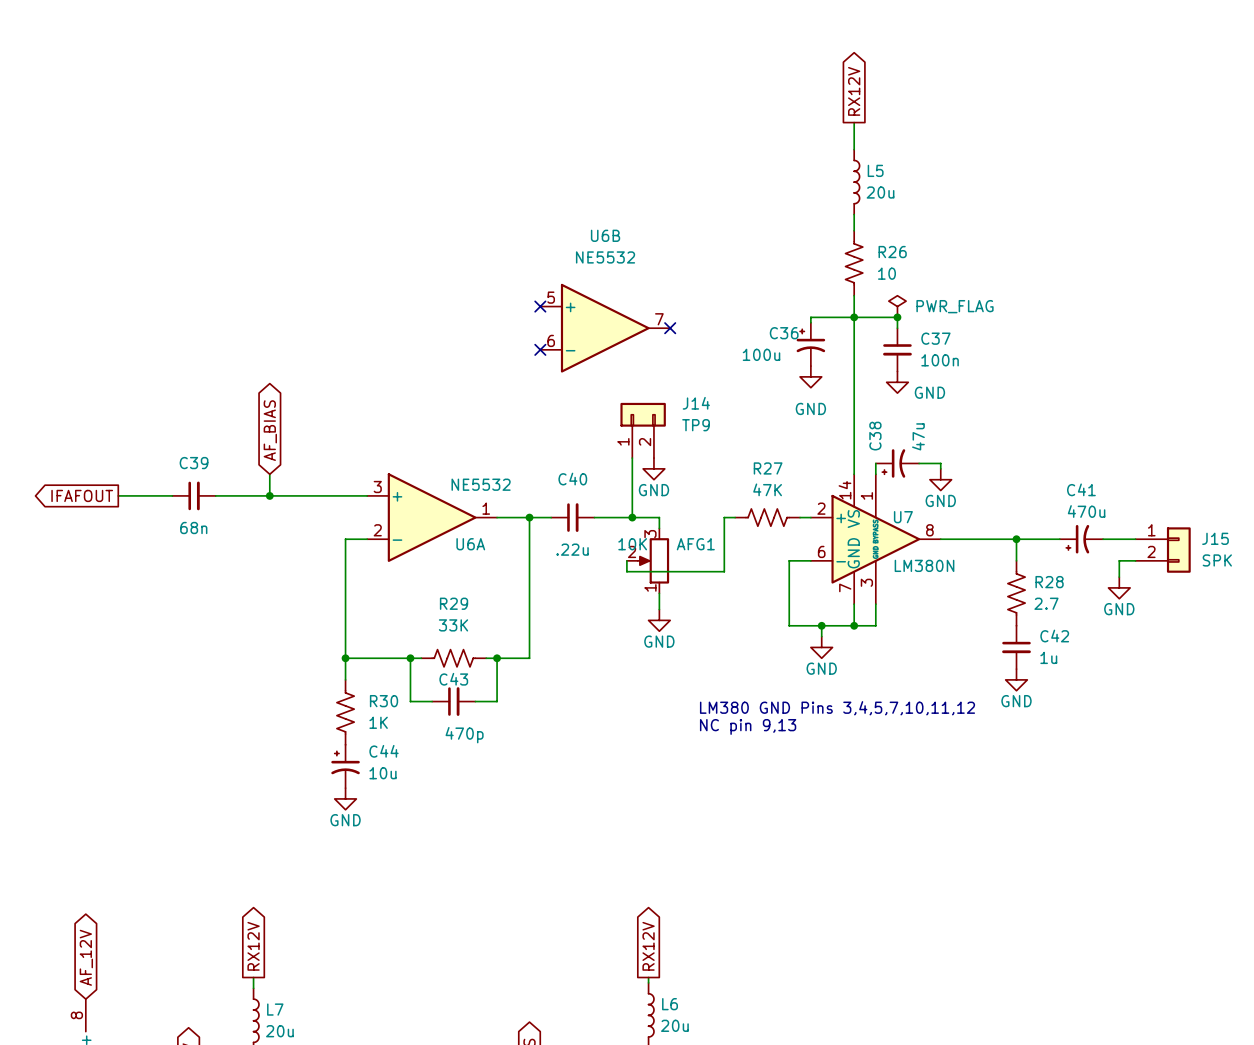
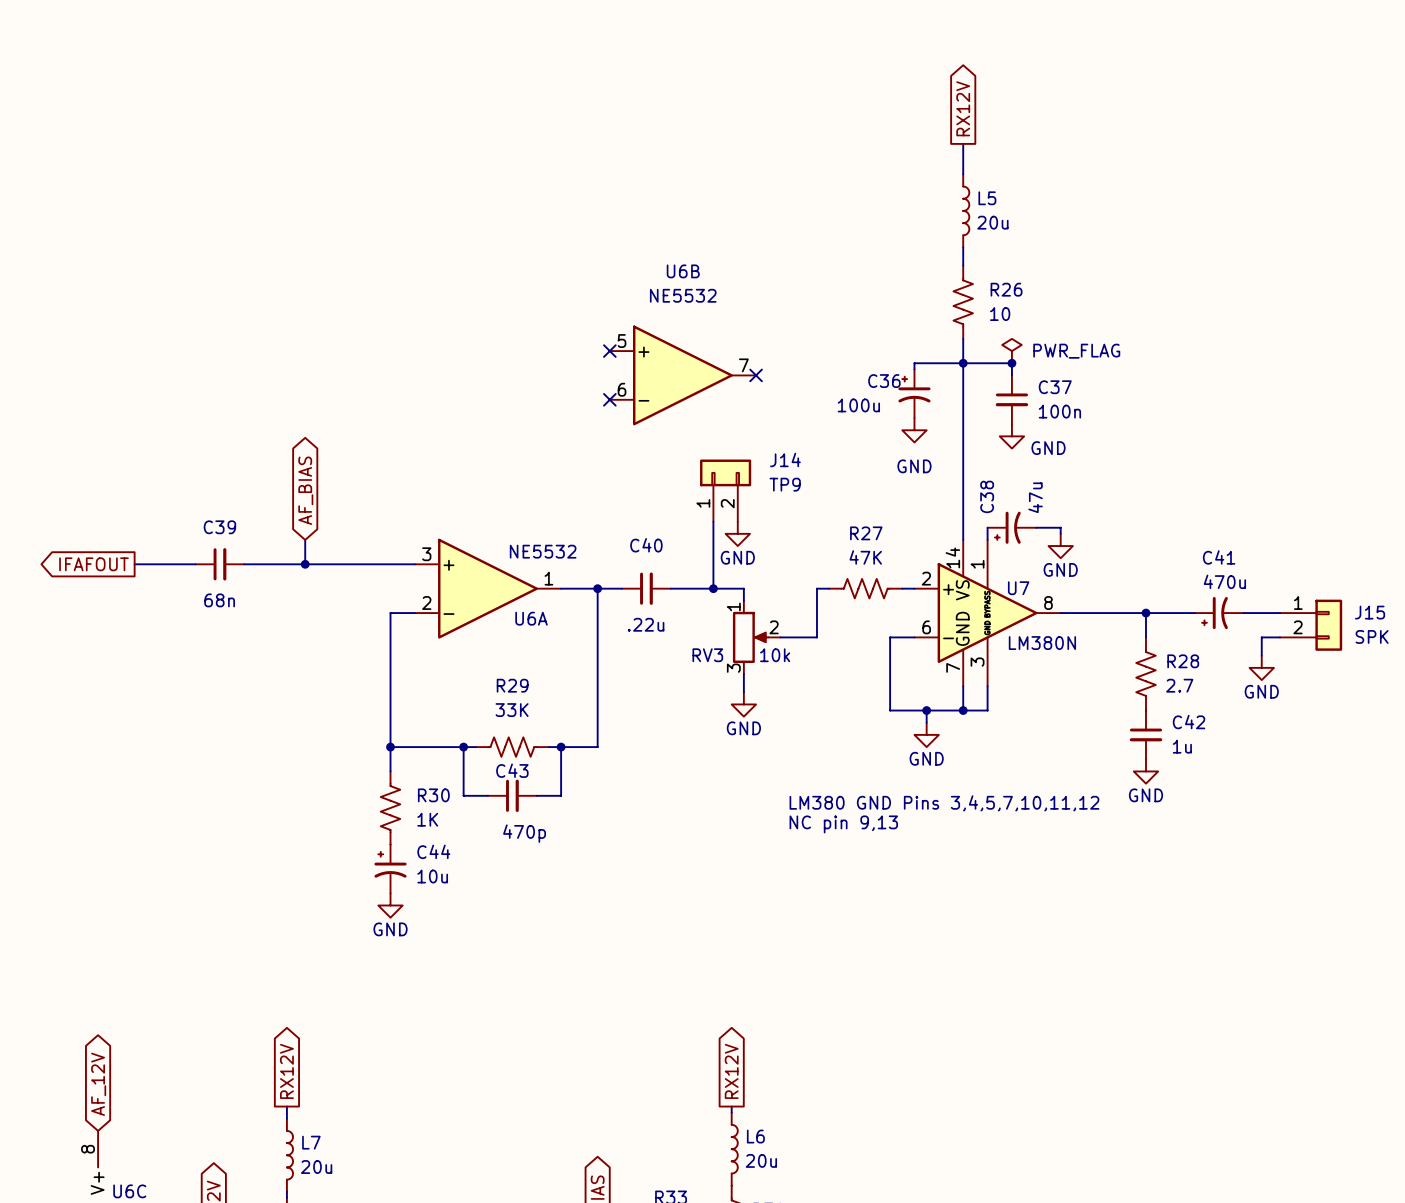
wire: (626, 560) (626, 571) (724, 571) (724, 560) -> (780, 637) (816, 637)
AFG1: 10K (648, 560) -> none
RV3: none -> 10k (756, 637)

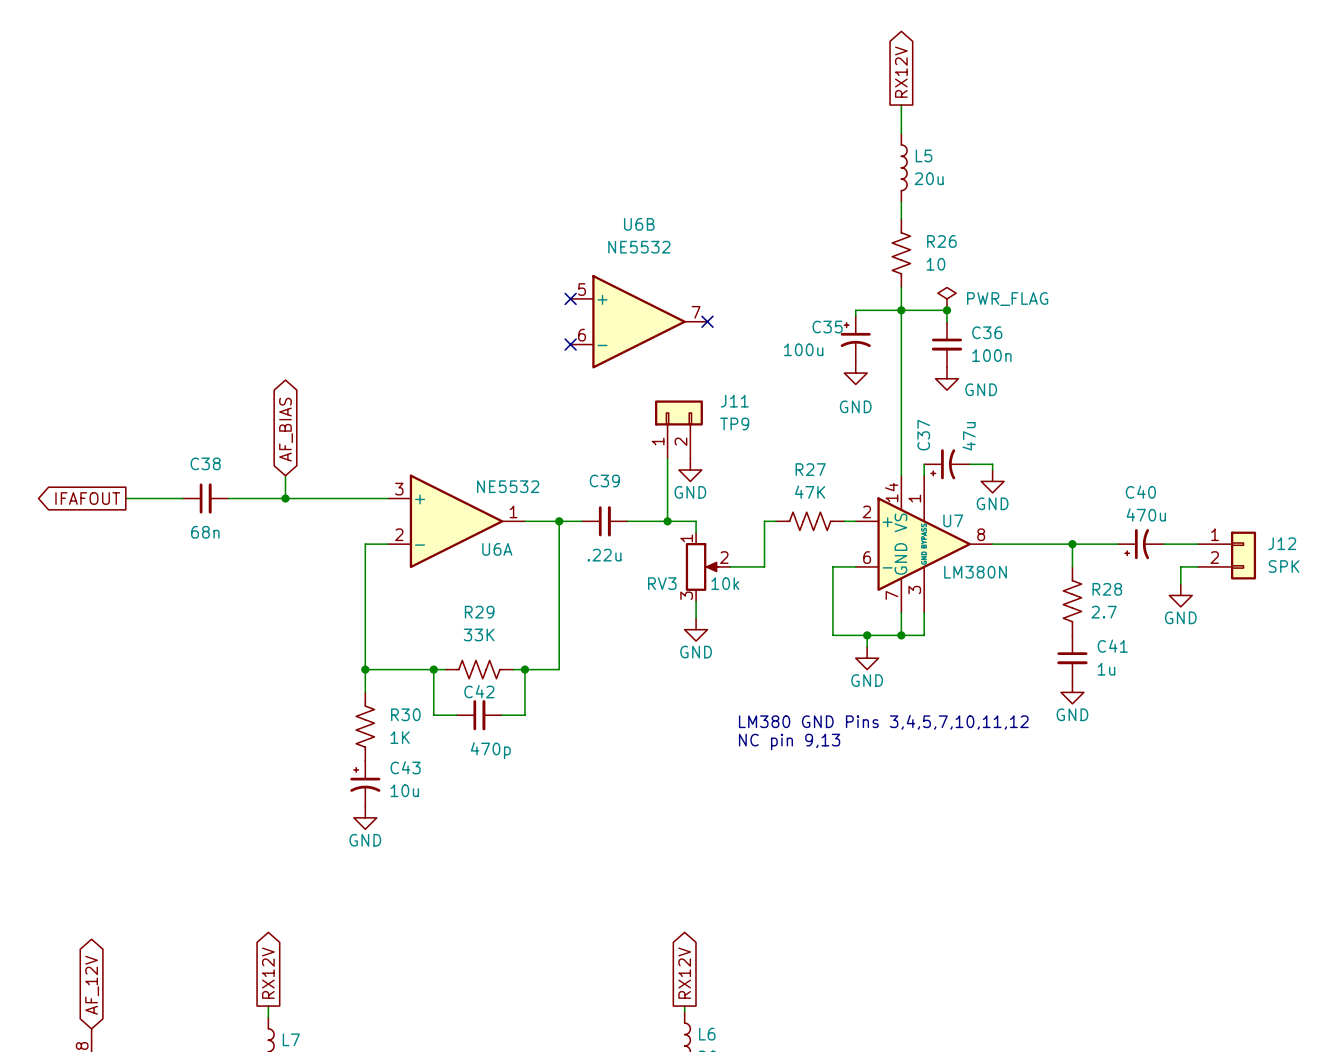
C36 name: C36 (884, 381) -> C35 (827, 327)
C37 name: C37 (1055, 387) -> C36 (987, 332)
J14 name: J14 (785, 459) -> J11 (734, 401)
C38 name: C38 (987, 496) -> C37 (923, 435)
C39 name: C39 (219, 527) -> C38 (205, 463)
C40 name: C40 (646, 545) -> C39 (604, 480)
C41 name: C41 (1219, 557) -> C40 (1140, 492)
J15 name: J15 (1370, 612) -> J12 (1282, 543)
C42 name: C42 (1189, 722) -> C41 (1112, 646)
C43 name: C43 (512, 770) -> C42 (479, 691)
C44 name: C44 (433, 851) -> C43 (405, 767)

